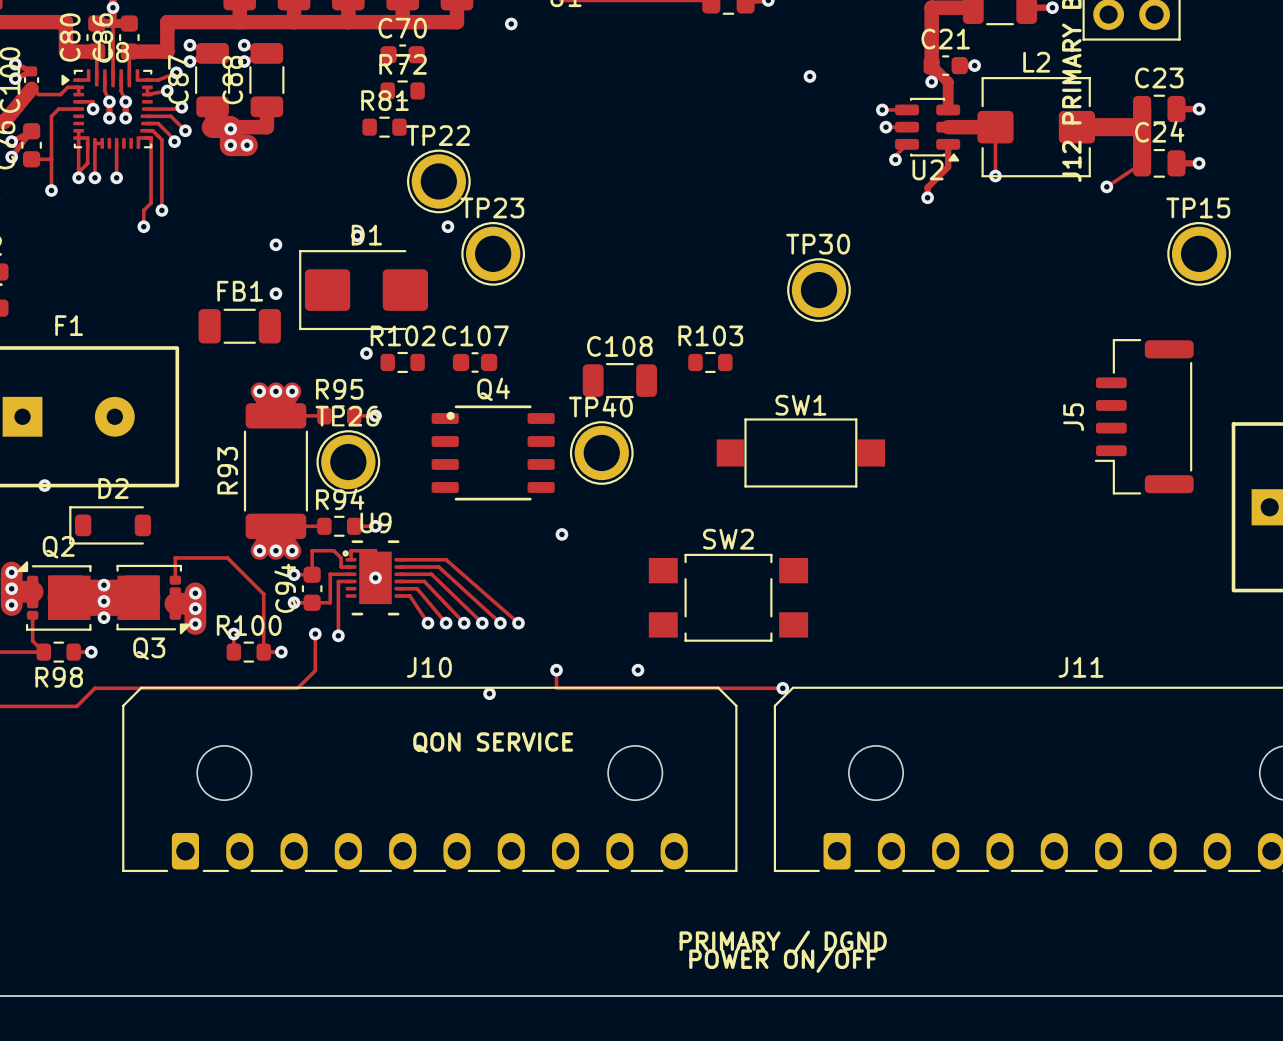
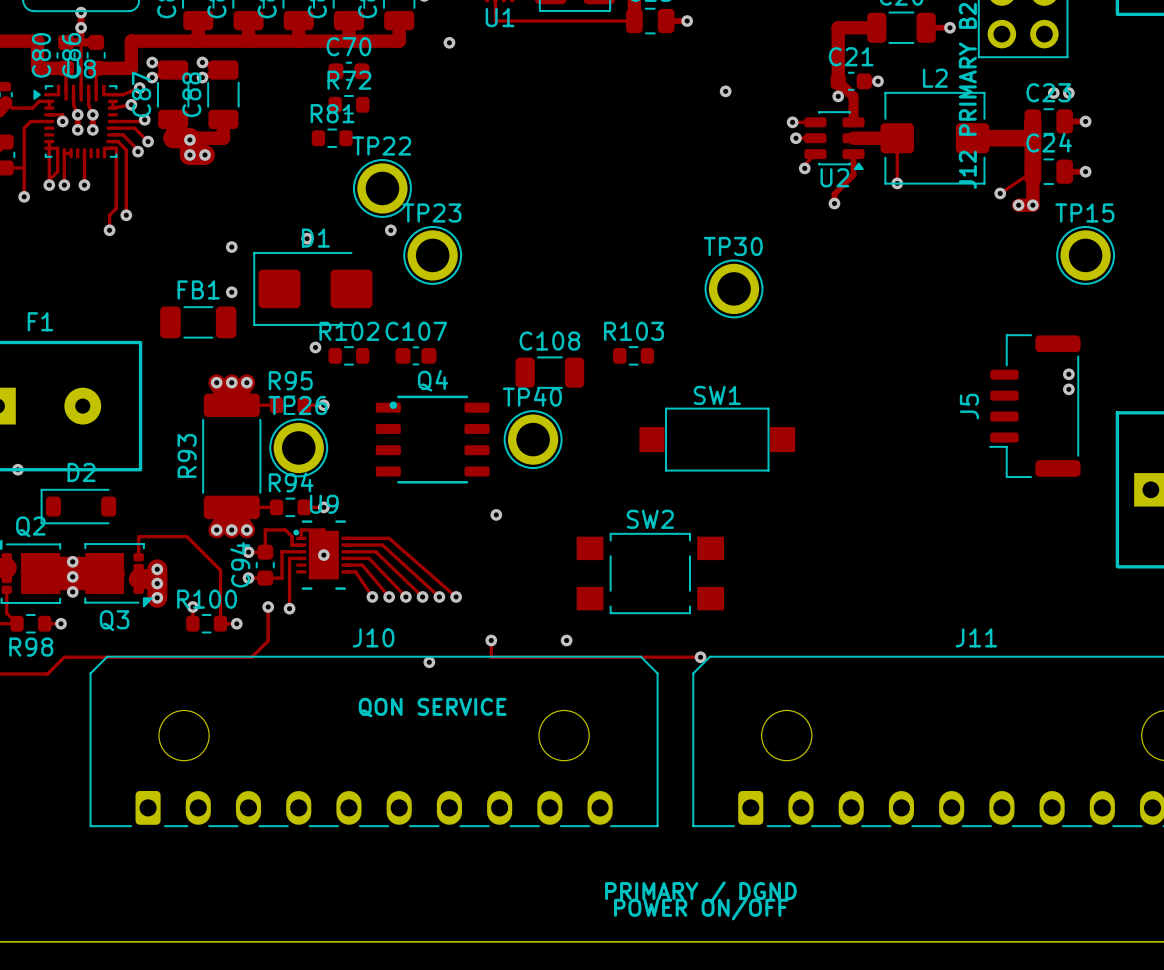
via: none -> (1053, 93)
via: none -> (1068, 93)
track: none -> (1032, 171) (1032, 205) (1018, 205)
via: none -> (1018, 205)
via: none -> (1032, 205)
via: none -> (1068, 374)
via: none -> (1068, 389)

